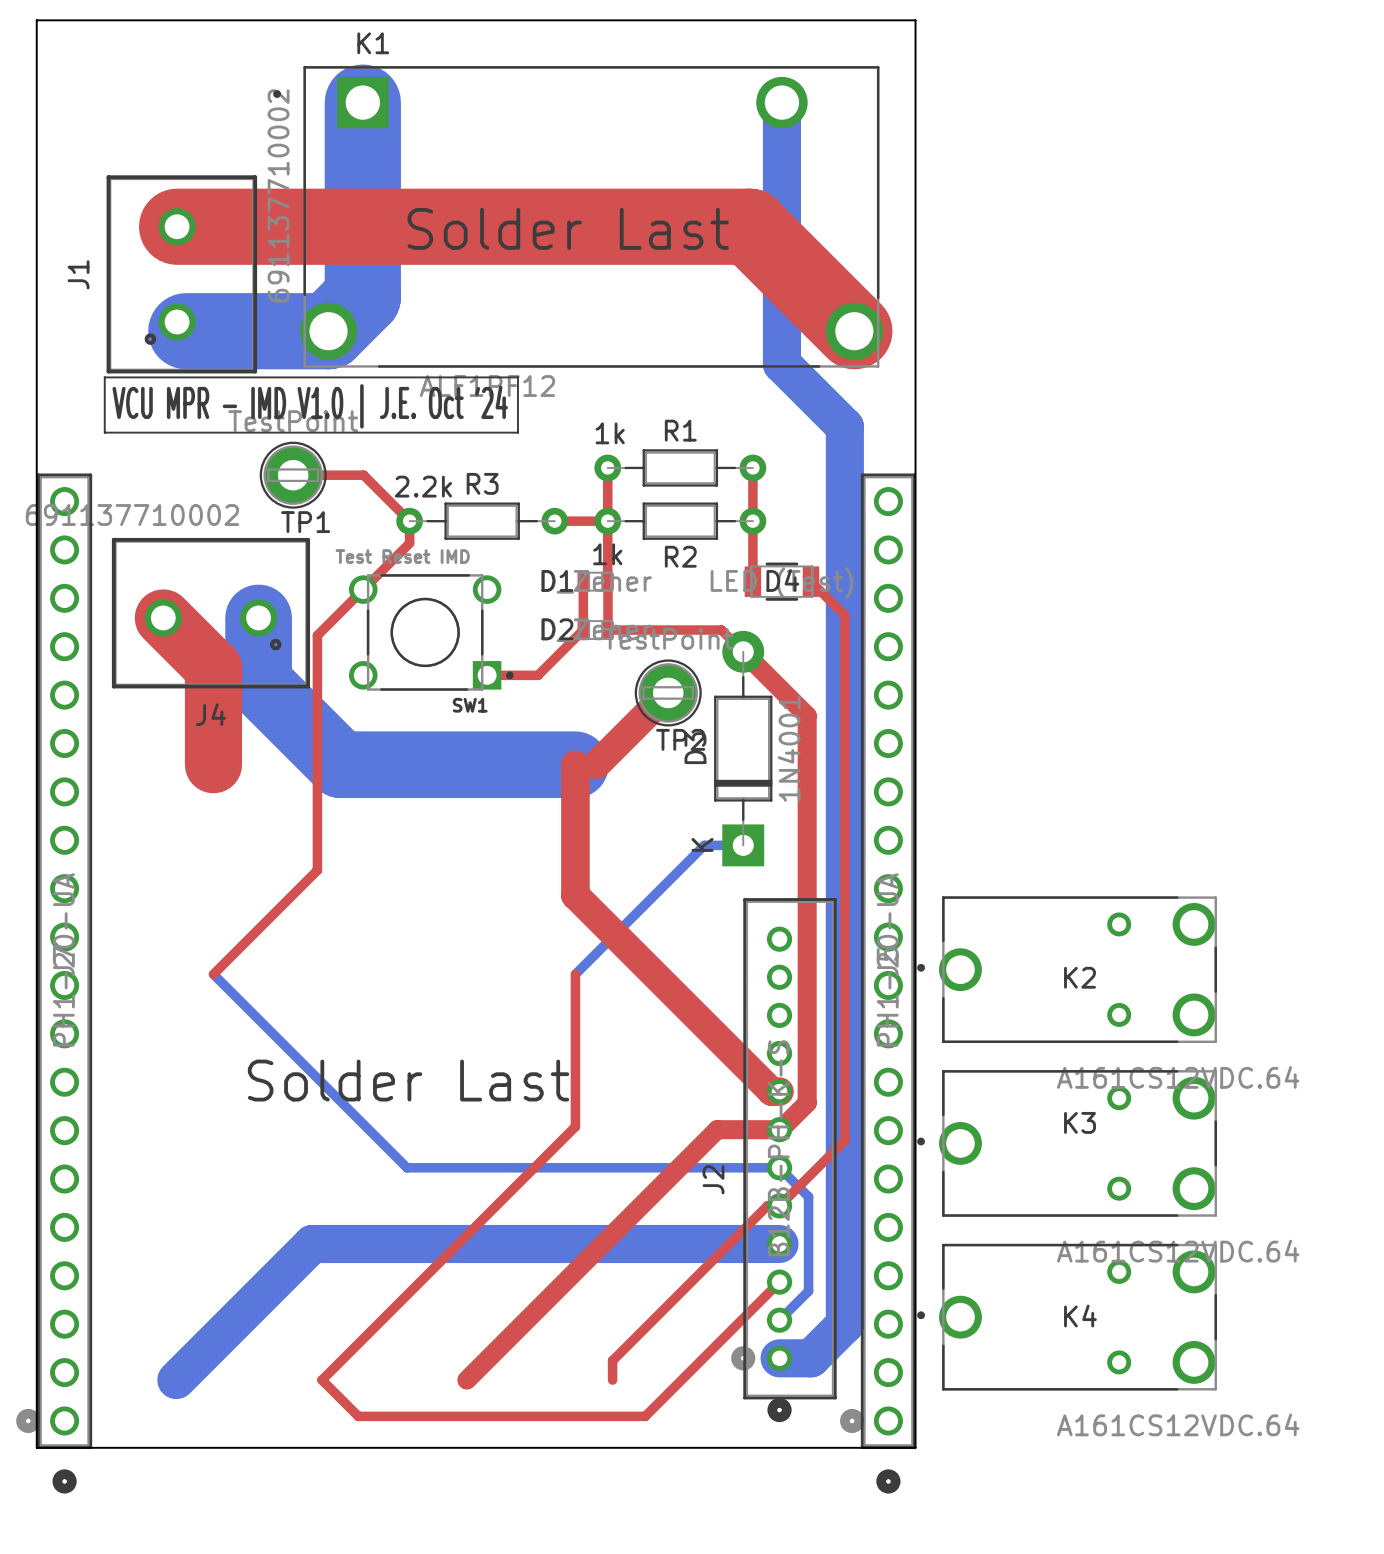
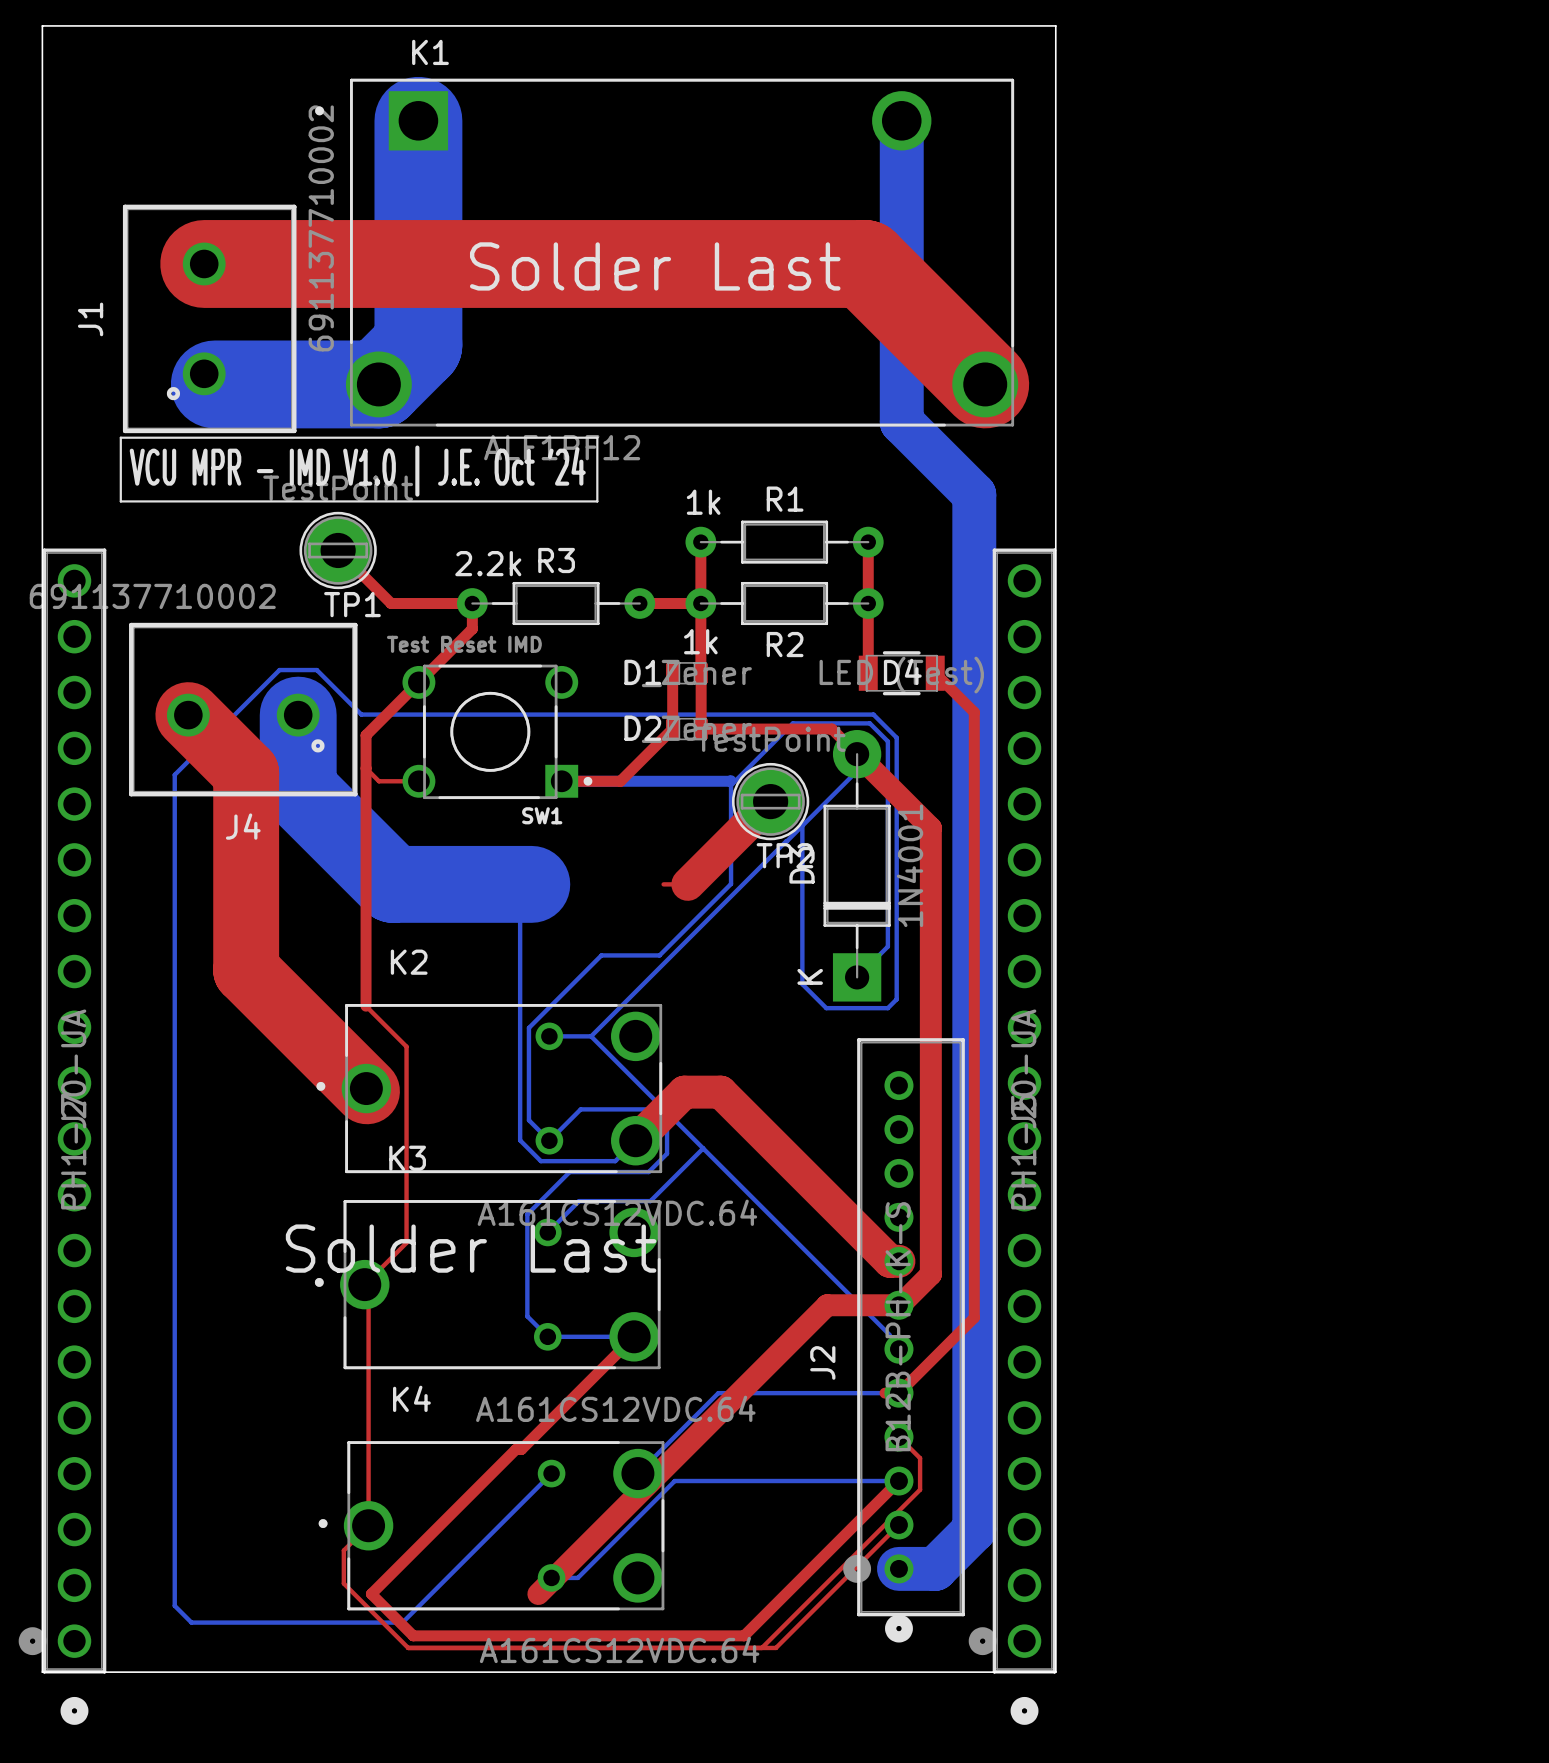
top track: (293, 475) (363, 475) (409, 521) -> (338, 550) (391, 603) (472, 603)
bottom track: none -> (857, 754) (857, 771) (591, 1036)
top track: none -> (366, 768) (378, 781) (418, 781)
bottom track: none -> (730, 780) (561, 781)
bottom track: none -> (802, 825) (802, 984) (826, 1008) (887, 1008) (896, 999) (896, 737) (873, 714) (361, 714) (316, 670) (279, 670) (174, 774) (174, 1605) (191, 1622) (402, 1622) (551, 1473)
top track: none -> (246, 884) (246, 970) (366, 1091)
bottom track: (461, 764) (575, 764) -> (531, 884) (520, 896) (520, 1140) (540, 1161) (615, 1161) (635, 1140)
top track: (575, 764) (575, 895) (624, 944) -> (635, 1140) (684, 1092) (720, 1092)
bottom track: (743, 845) (704, 845) (575, 974) -> (857, 977) (887, 946) (887, 741) (869, 723) (792, 723) (731, 785) (731, 883) (659, 955) (601, 955) (528, 1027) (528, 1120) (549, 1140) (580, 1109) (648, 1109) (667, 1127) (667, 1153) (648, 1172) (569, 1172) (527, 1214) (527, 1316) (547, 1336) (634, 1336)
top track: (317, 870) (213, 974) -> (366, 1006) (406, 1046) (406, 1242) (364, 1284) (368, 1288) (368, 1525) (343, 1550) (343, 1583) (408, 1647) (775, 1647) (898, 1524)
bottom track: none -> (549, 1036) (591, 1036)
bottom track: none -> (591, 1036) (889, 1335)
K2 position: (1067, 969) -> (489, 1088)
bottom track: (213, 974) (406, 1167) (779, 1167) (808, 1196) (808, 1291) (779, 1320) -> none
top track: (575, 974) (575, 1126) (447, 1254) -> (634, 1336) (521, 1449) (516, 1449)
K2 name position: K2 (1080, 977) -> K2 (409, 962)
bottom track: none -> (703, 1148) (650, 1201) (579, 1201) (547, 1232)
K3 name position: K3 (1080, 1122) -> K3 (407, 1158)
K3 position: (1067, 1143) -> (487, 1284)
top track: (767, 1205) (612, 1360) (612, 1380) -> none
bottom track: none -> (898, 1393) (718, 1393) (637, 1473)
top track: none -> (898, 1437) (920, 1458) (920, 1489) (761, 1647)
bottom track: (779, 1244) (312, 1244) (176, 1380) -> none
bottom track: none -> (898, 1481) (674, 1481) (577, 1577) (551, 1577)
K4 name position: K4 (1080, 1316) -> K4 (411, 1398)
K4 position: (1067, 1317) -> (491, 1525)

